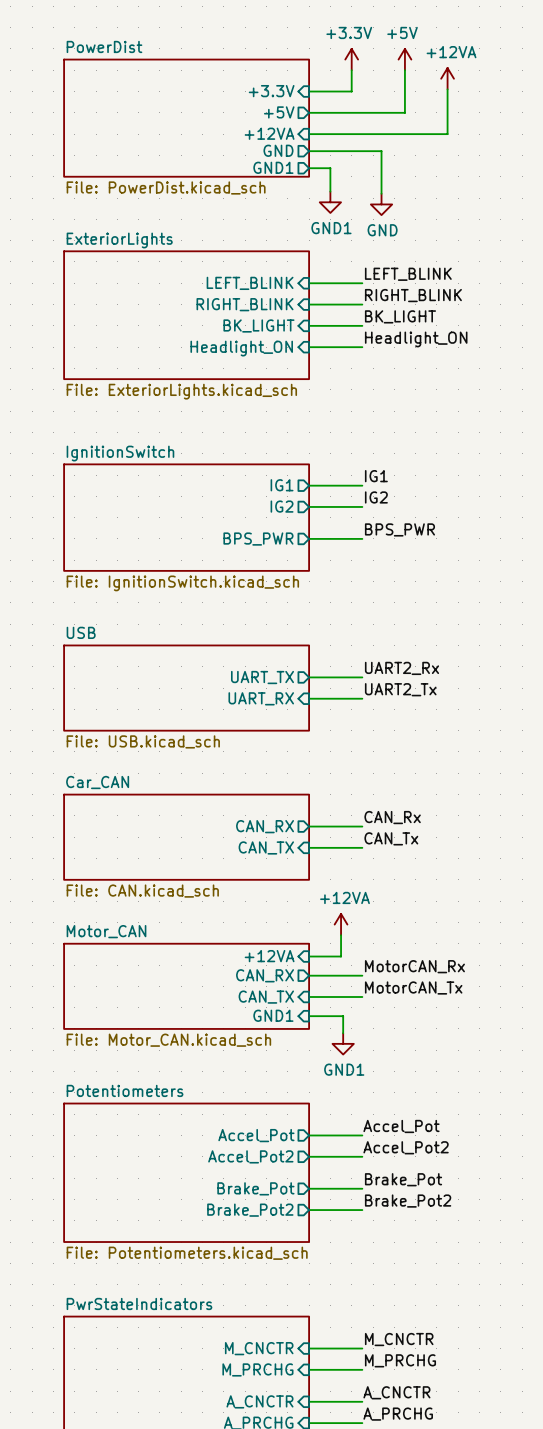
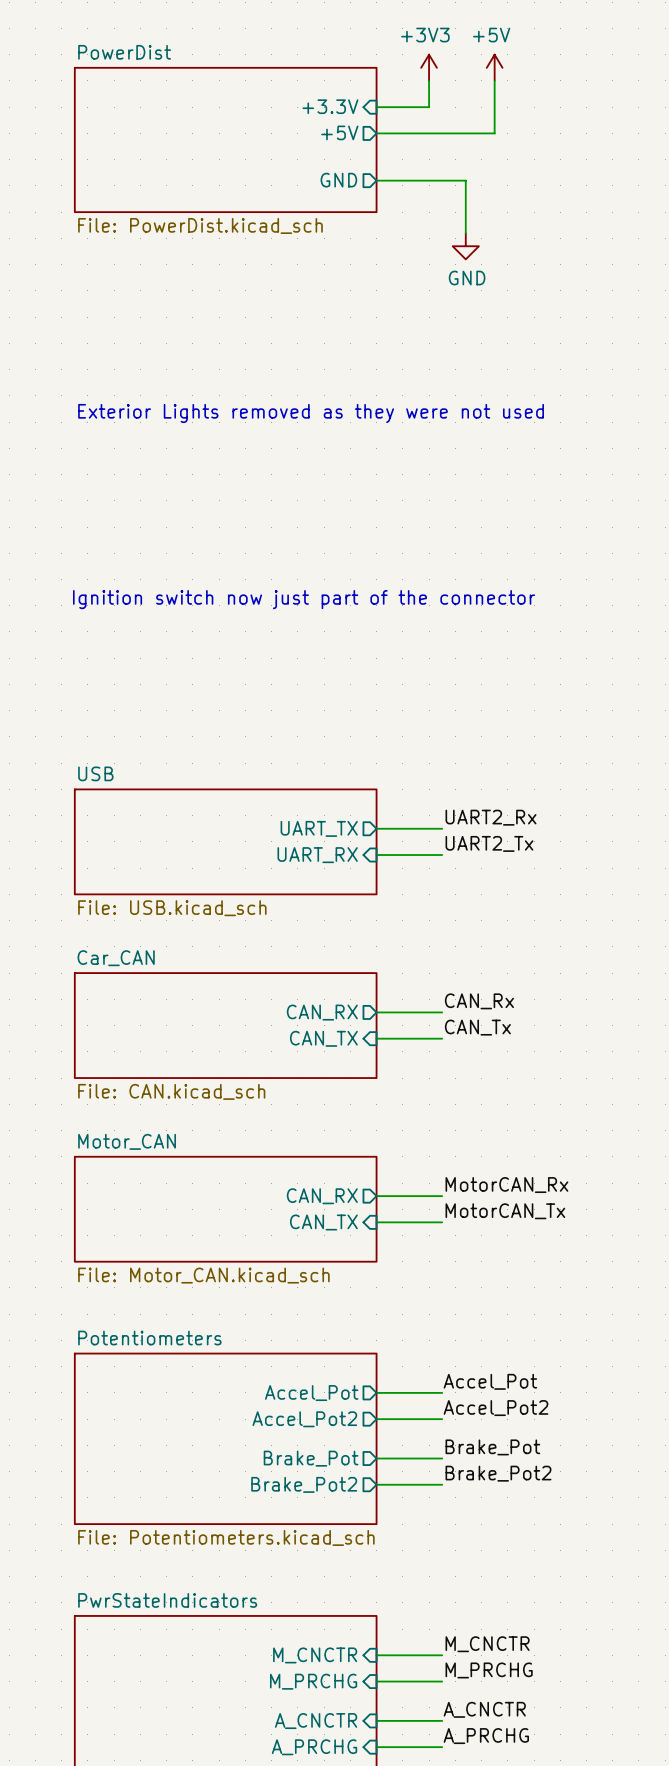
power symbol: +3.3V (351, 59) -> +3V3 (429, 67)
power symbol: +12VA (447, 78) -> none
wire: (447, 89) (447, 134) (309, 134) -> none
sheet pin: +12VA (269, 133) -> none
sheet pin: GND1 (273, 167) -> none
wire: (309, 168) (330, 168) (330, 191) -> none
power symbol: GND1 (330, 202) -> none
label: LEFT_BLINK (408, 274) -> none
sheet pin: LEFT_BLINK (250, 283) -> none
wire: (309, 283) (362, 283) -> none
label: RIGHT_BLINK (413, 295) -> none
sheet pin: RIGHT_BLINK (245, 304) -> none
wire: (309, 304) (362, 304) -> none
sheet ExteriorLights: File: ExteriorLights.kicad_sch (186, 315) -> none
label: BK_LIGHT (400, 316) -> none
sheet pin: BK_LIGHT (258, 325) -> none
wire: (309, 325) (362, 325) -> none
label: Headlight_ON (416, 339) -> none
text: none -> Exterior Lights removed as they were not used (311, 413)
wire: (309, 347) (362, 347) -> none
sheet pin: Headlight_ON (241, 348) -> none
label: IG1 (376, 476) -> none
sheet pin: IG1 (282, 485) -> none
wire: (309, 485) (362, 485) -> none
text: none -> Ignition switch now just part of the connector (304, 599)
label: IG2 (376, 497) -> none
sheet pin: IG2 (282, 506) -> none
wire: (309, 506) (362, 506) -> none
sheet IgnitionSwitch: File: IgnitionSwitch.kicad_sch (186, 517) -> none
label: BPS_PWR (399, 529) -> none
wire: (309, 538) (362, 538) -> none
sheet pin: BPS_PWR (258, 539) -> none
power symbol: +12VA (341, 924) -> none
wire: (341, 935) (341, 956) (309, 956) -> none
sheet pin: +12VA (269, 956) -> none
sheet pin: GND1 (273, 1015) -> none
wire: (309, 1016) (343, 1016) (343, 1033) -> none
power symbol: GND1 (343, 1043) -> none

